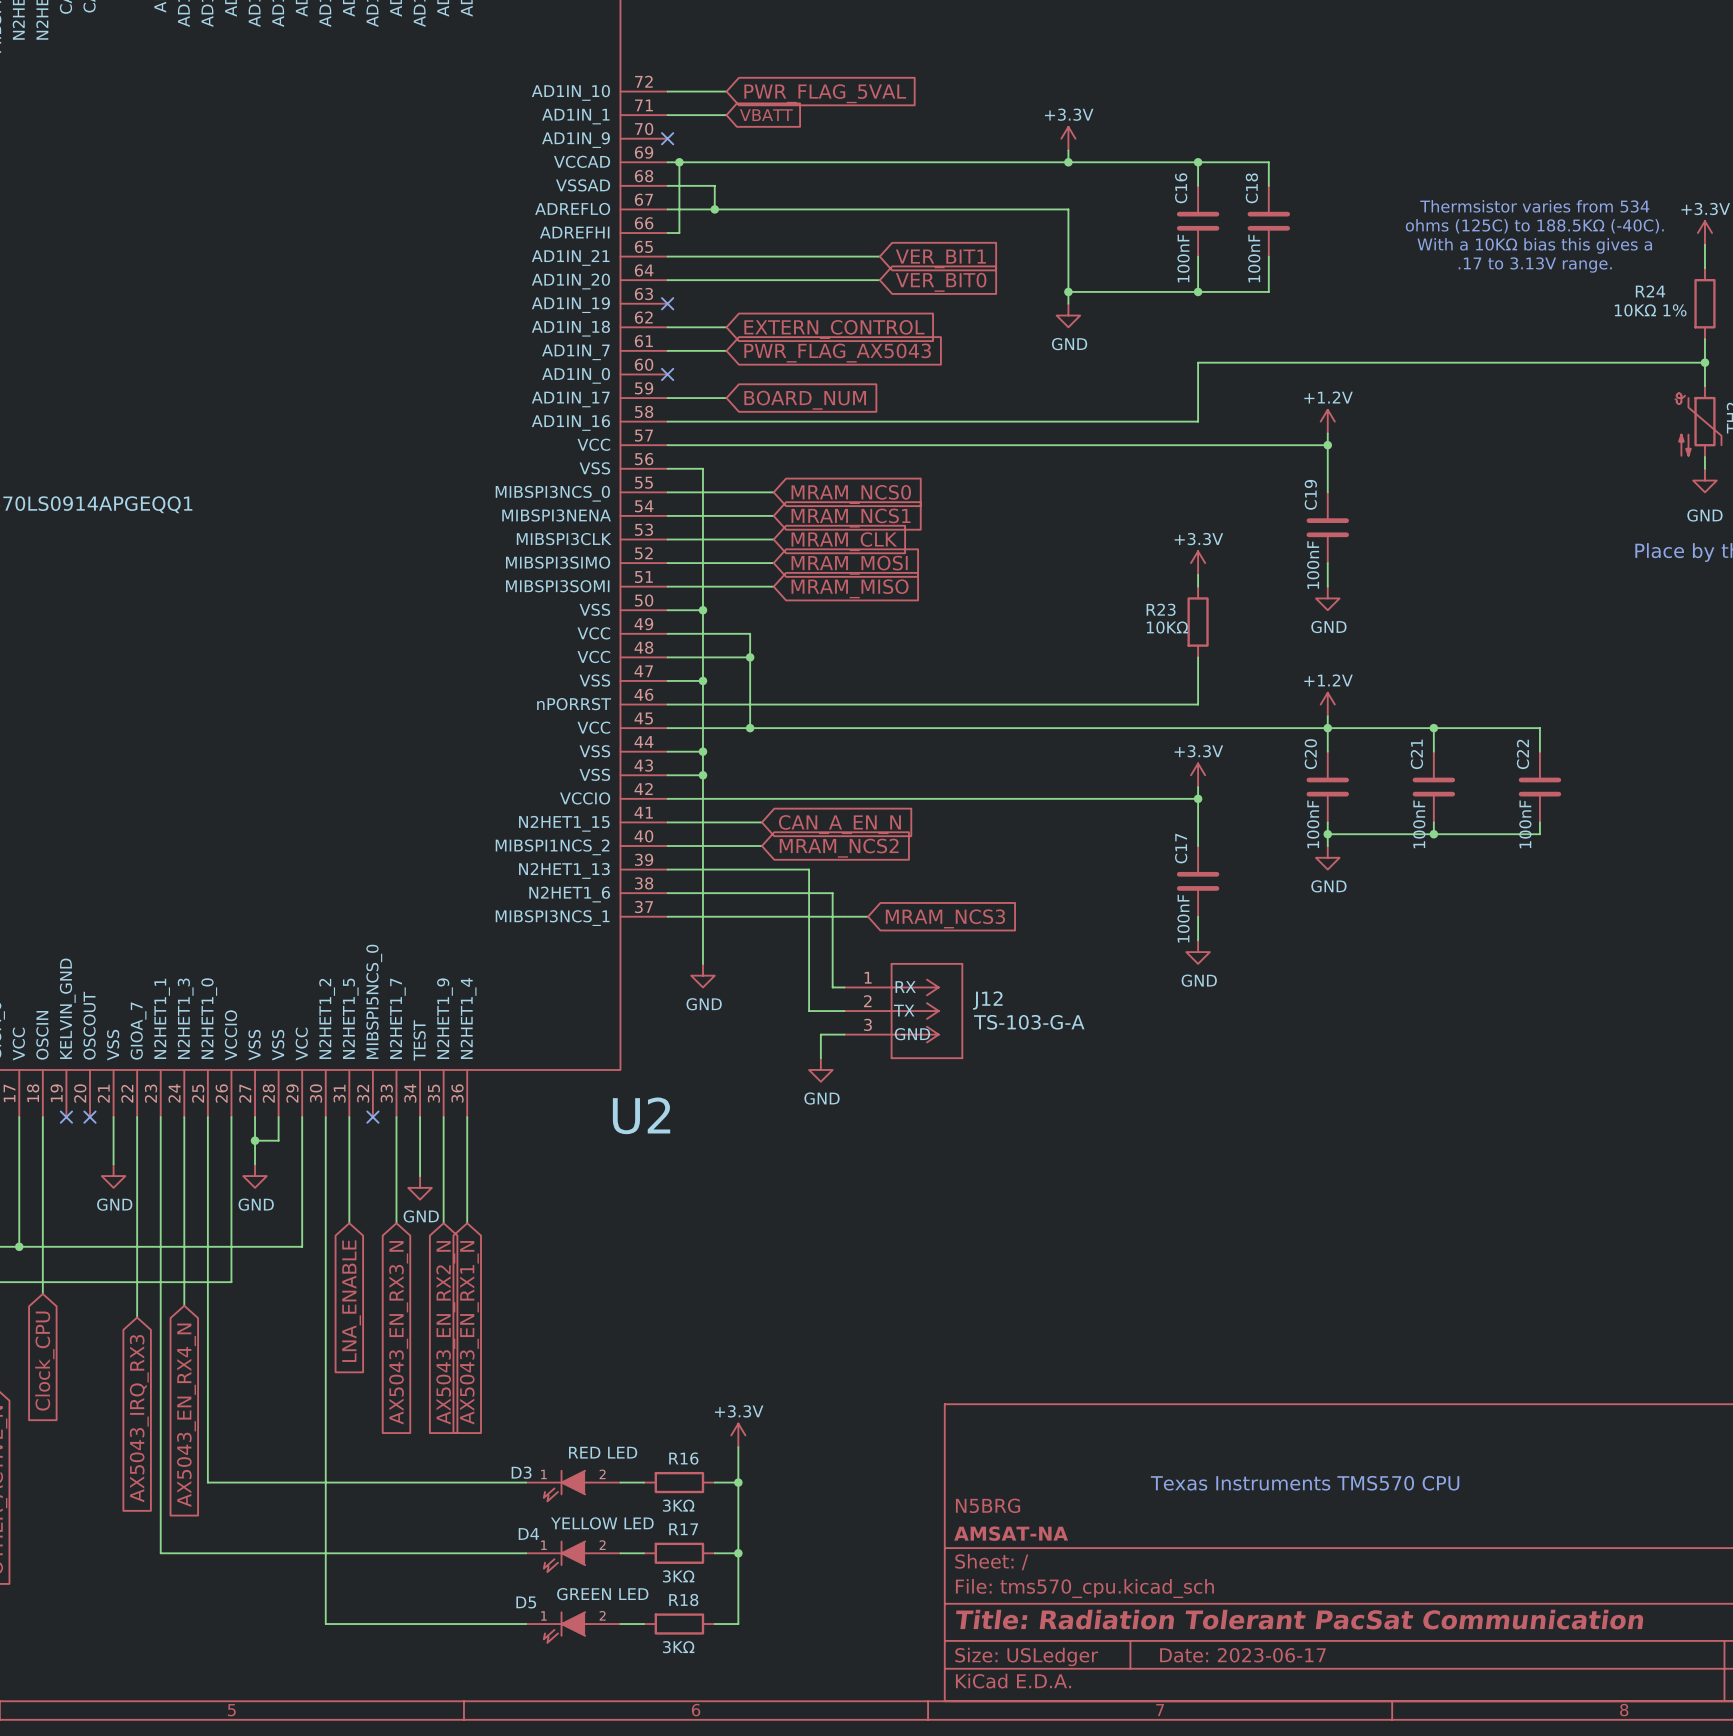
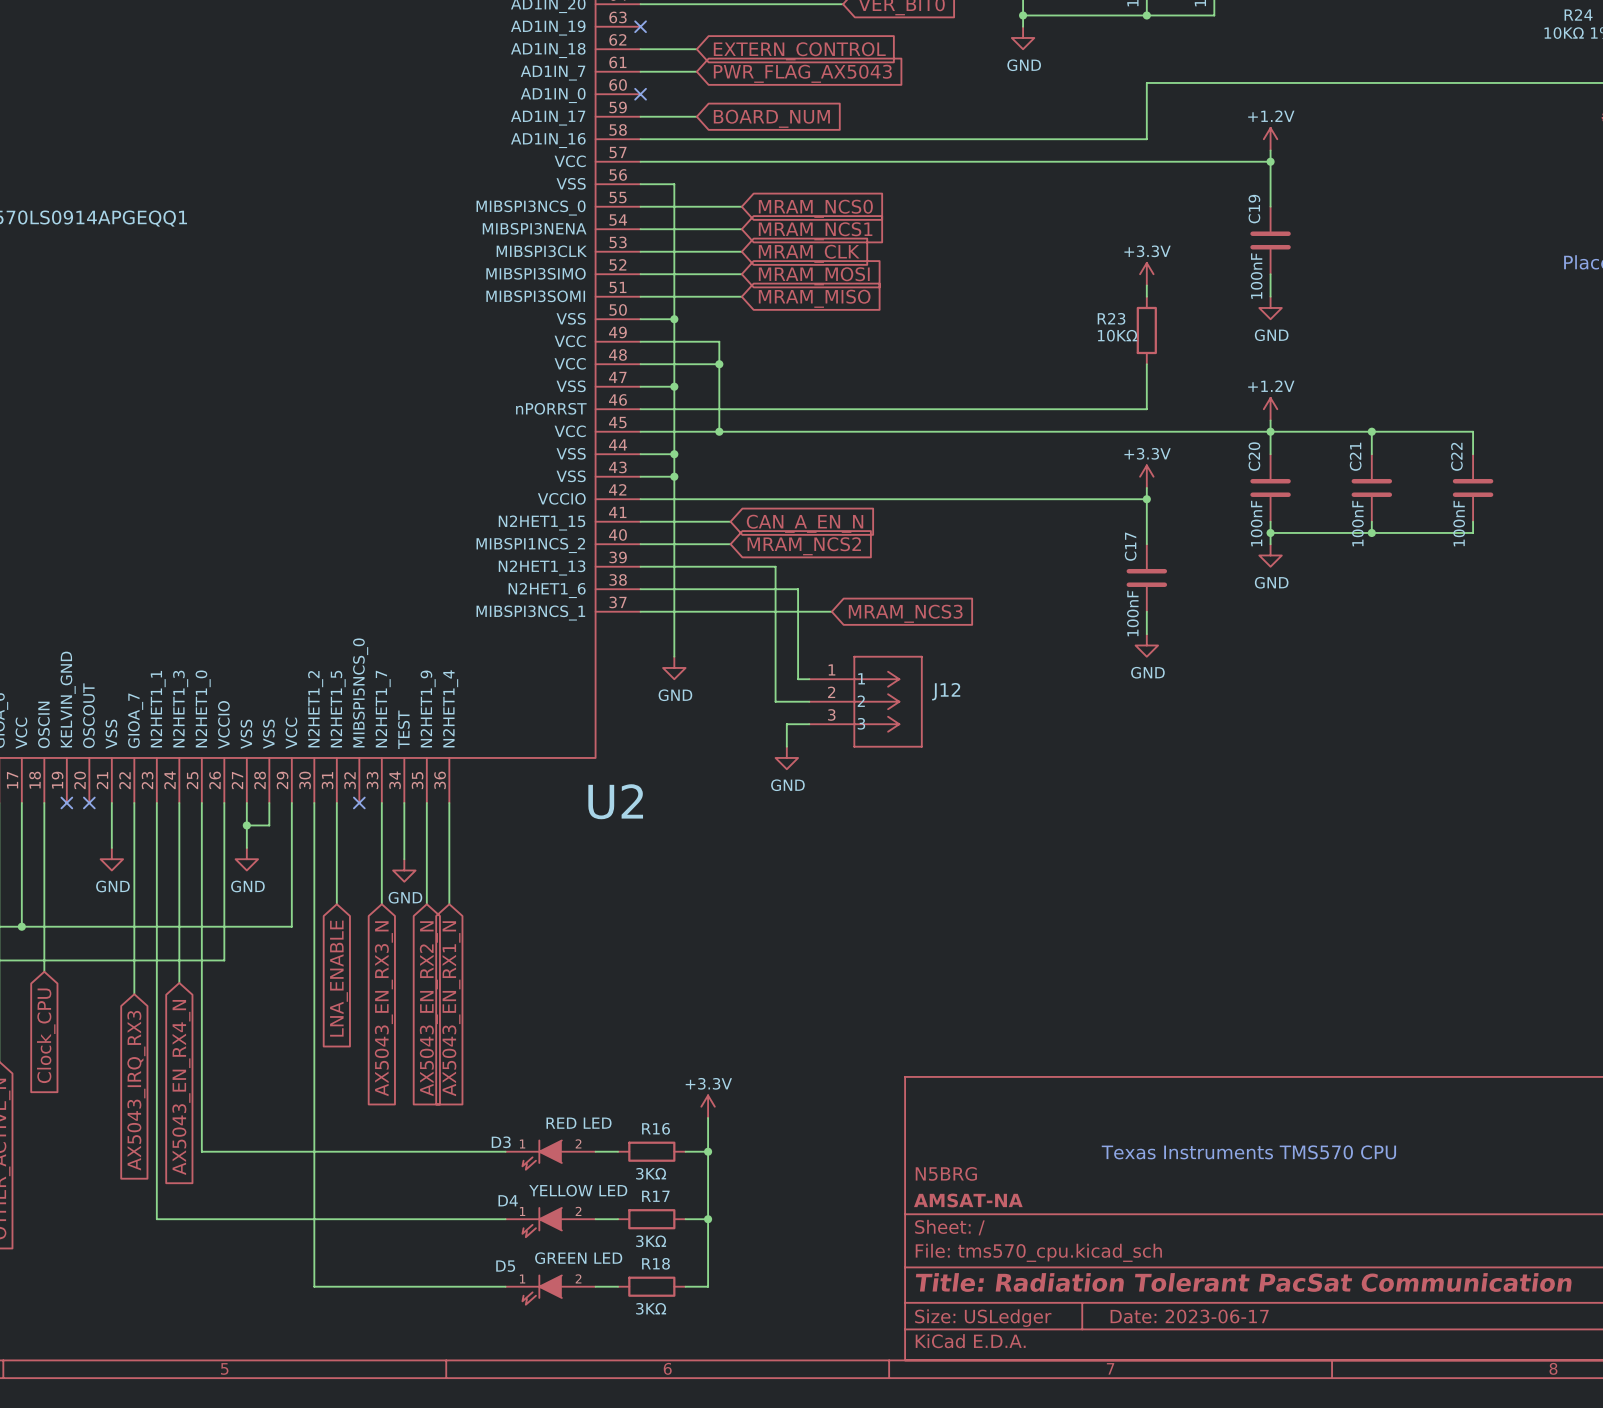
J12 pin name: RX (905, 987) -> 1 (861, 678)
J12 pin name: TX (904, 1010) -> 2 (861, 701)
J12 value: TS-103-G-A (1029, 1022) -> none
J12 pin name: GND (912, 1034) -> 3 (861, 723)

